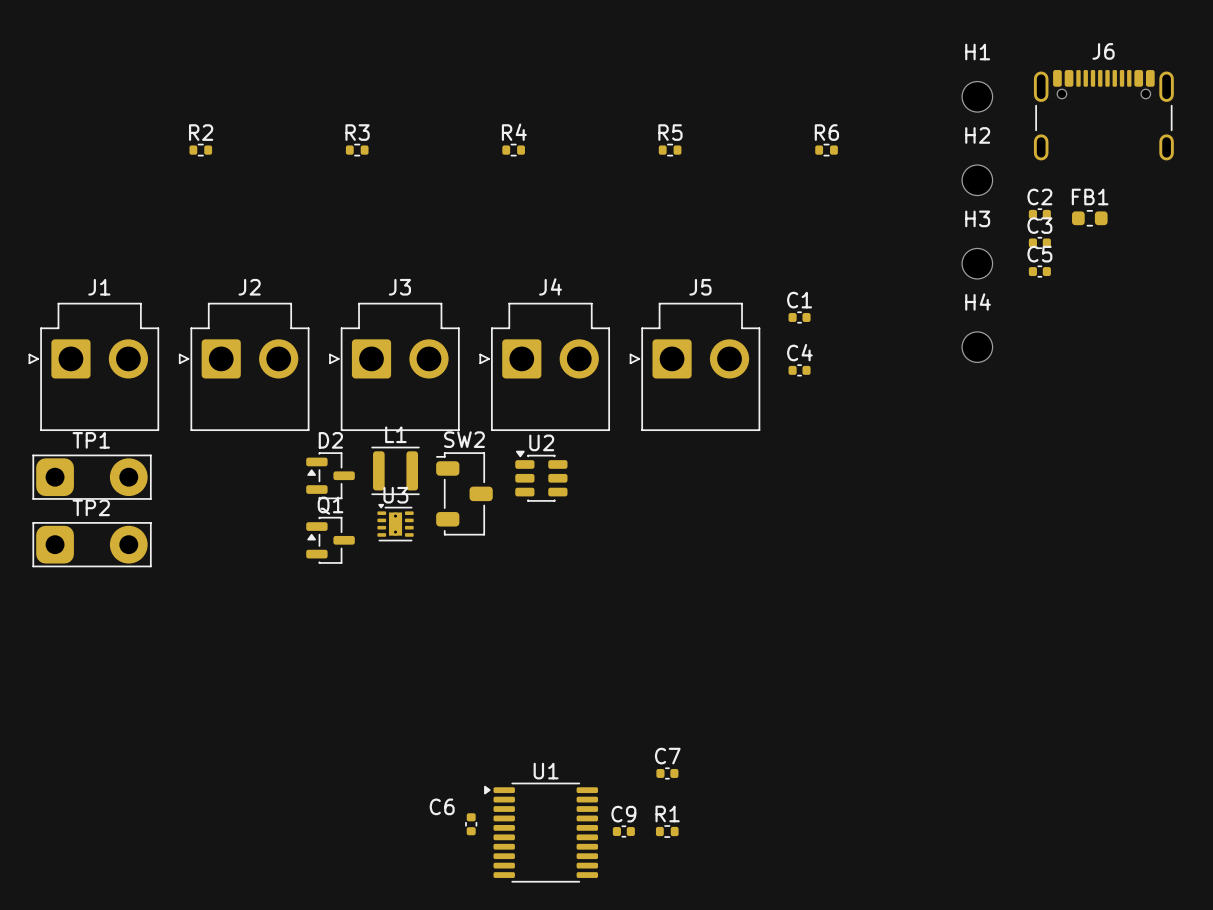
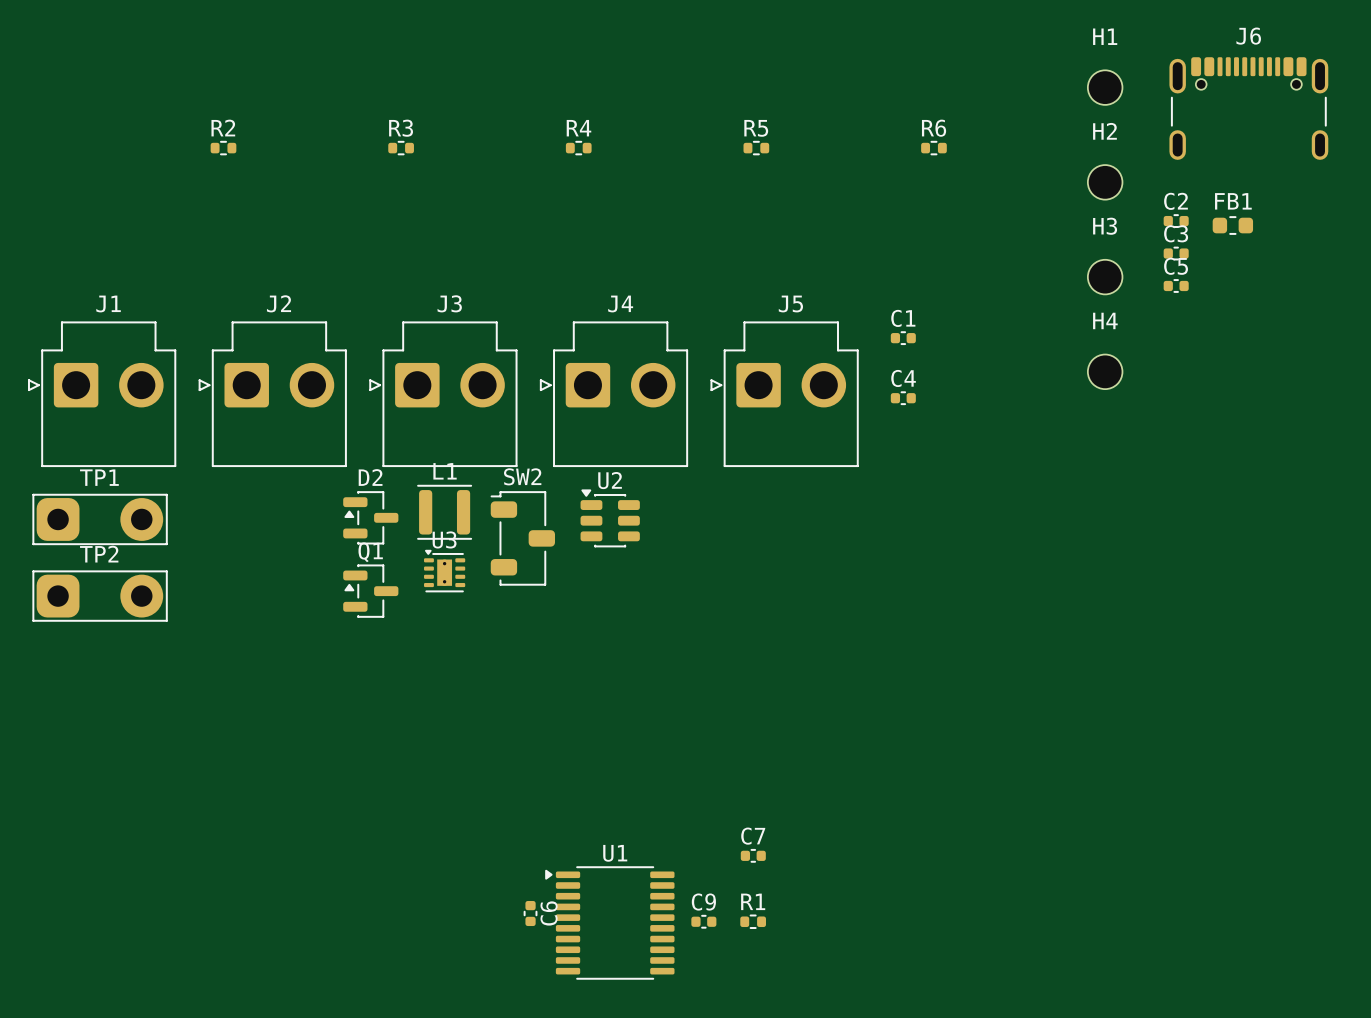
C6 name rotation: 0° (442, 806) -> 90° counterclockwise (549, 913)
C6 name position: C6 (442, 806) -> C6 (549, 913)

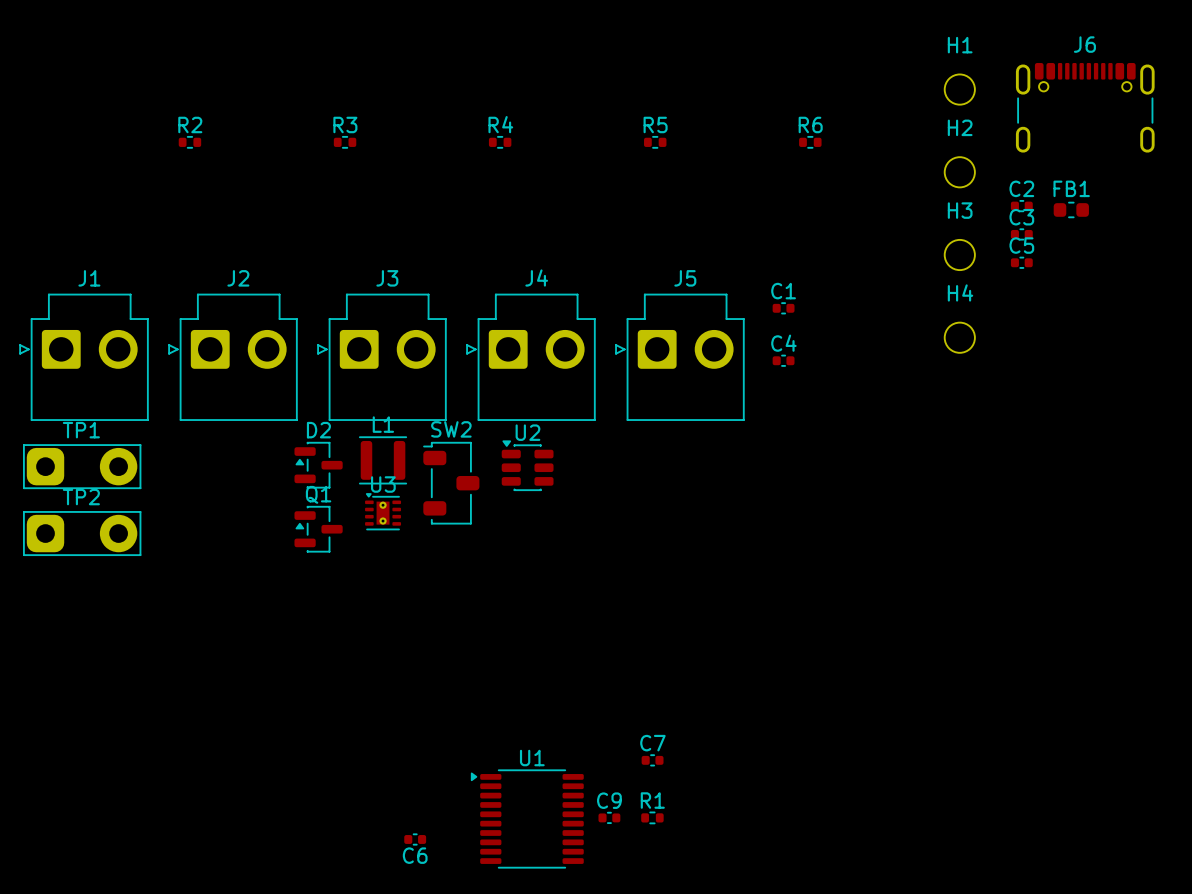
C6 rotation: 0° (530, 913) -> 90° clockwise (415, 839)
C6 position: (530, 913) -> (415, 839)

